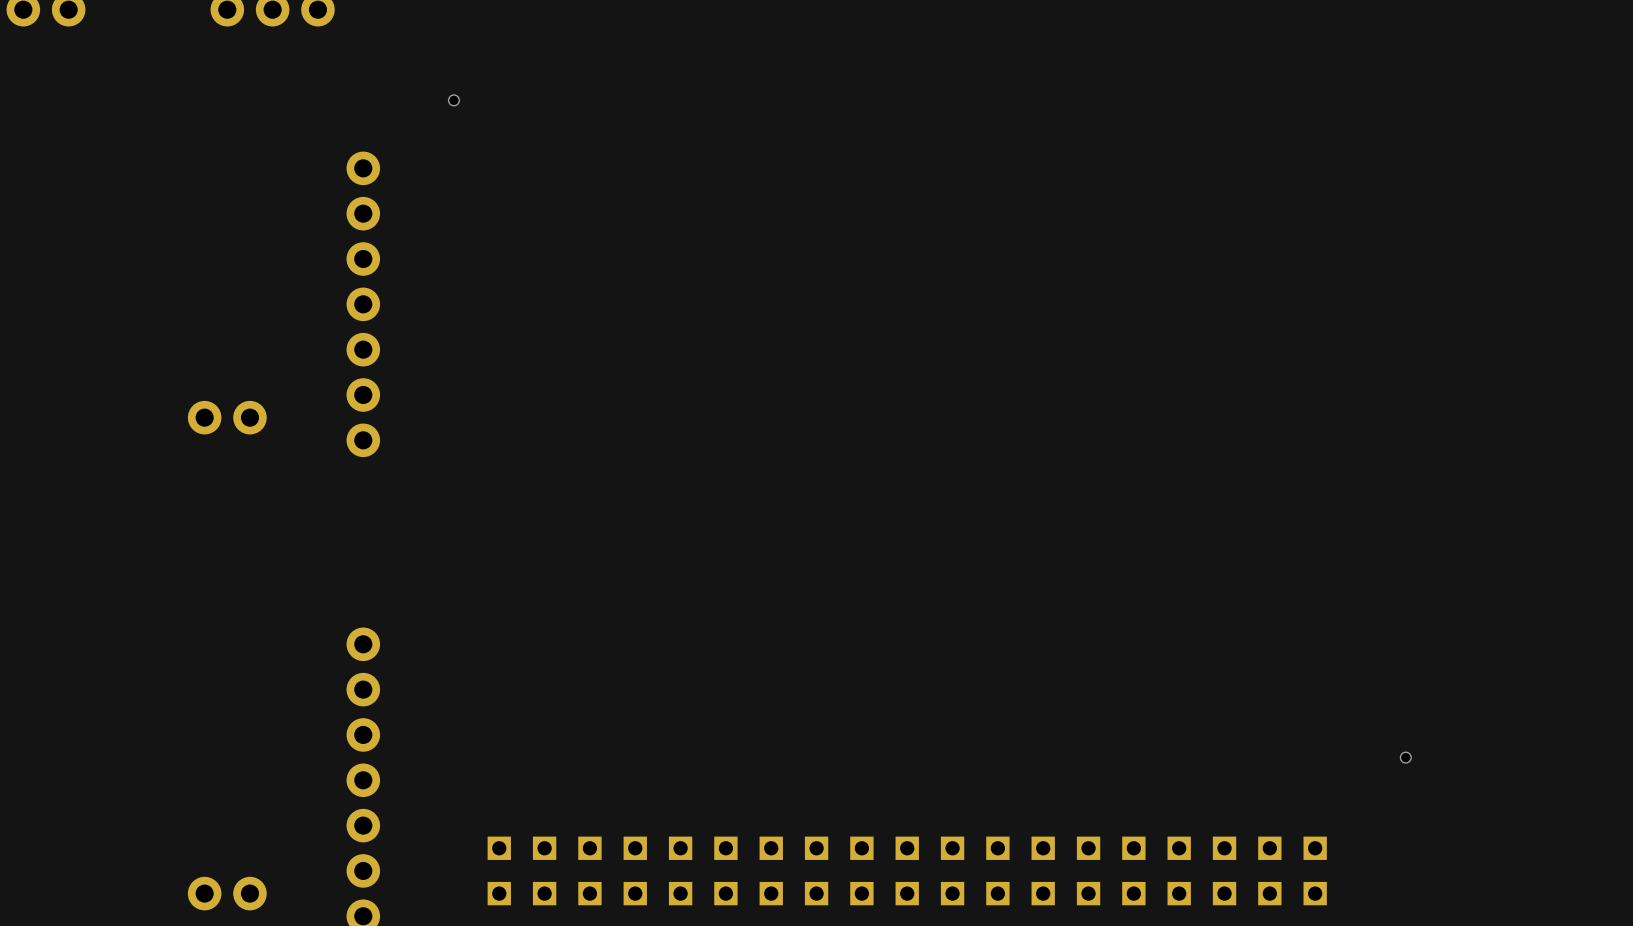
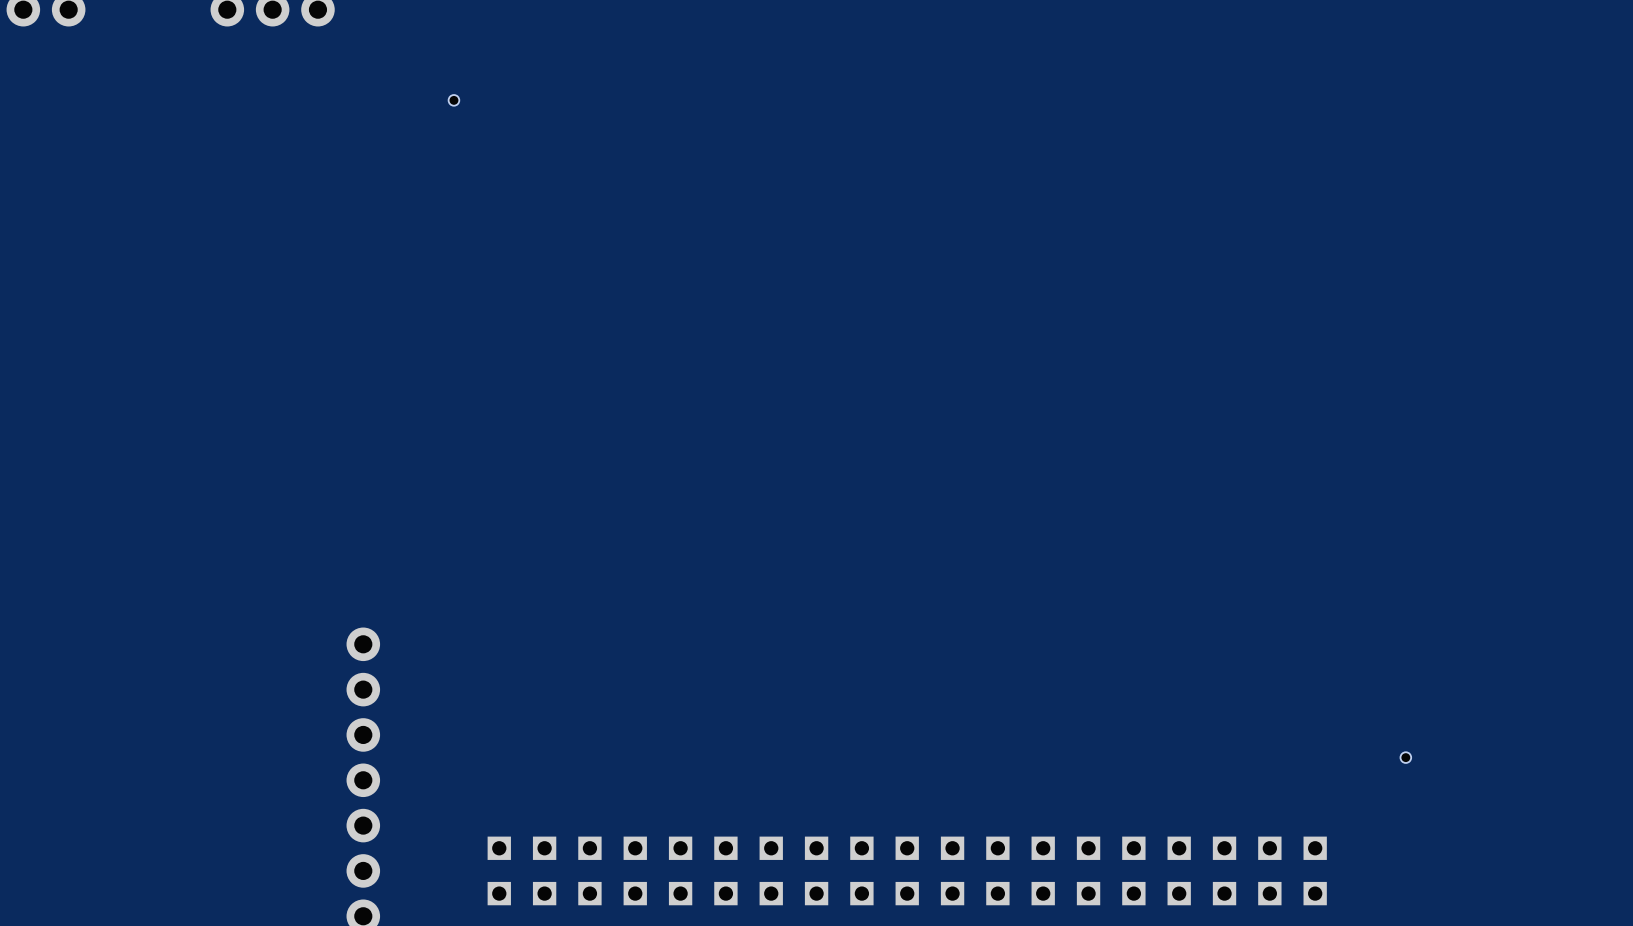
part: (363, 304) -> none
part: (227, 417) -> none
part: (227, 893) -> none

